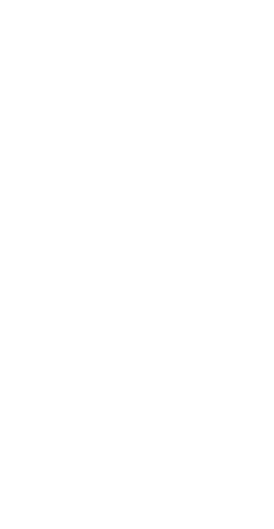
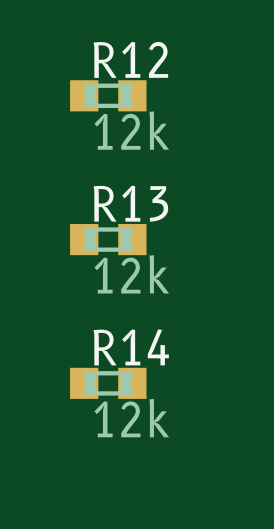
R12: none -> 12k (108, 95)
R13: none -> 12k (108, 239)
R14: none -> 12k (108, 383)

